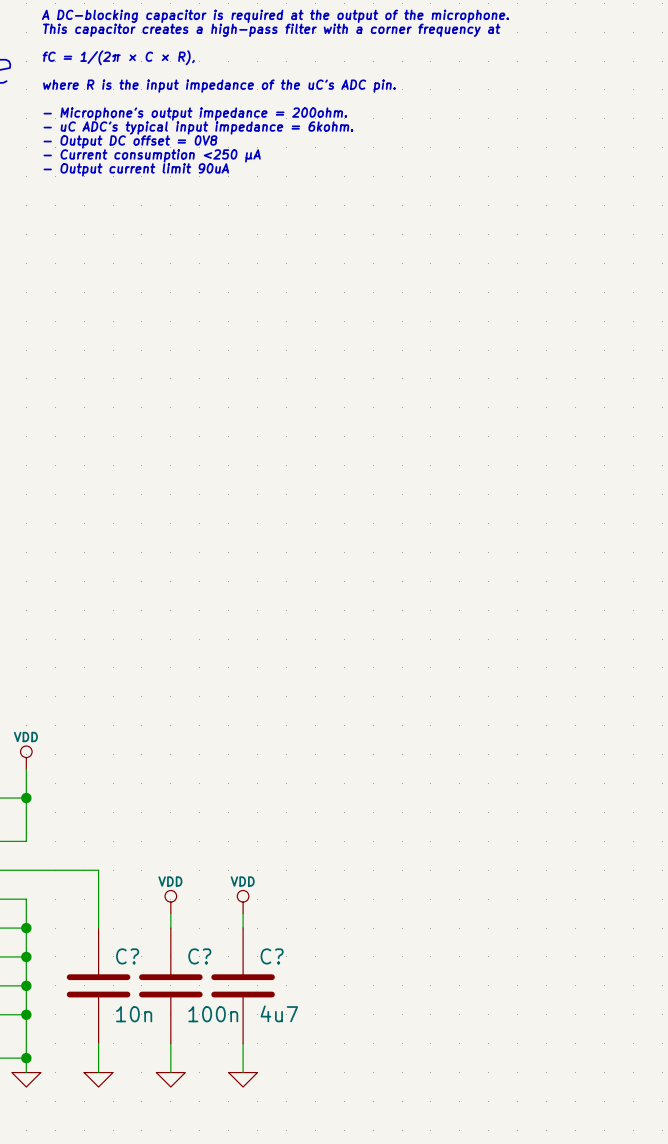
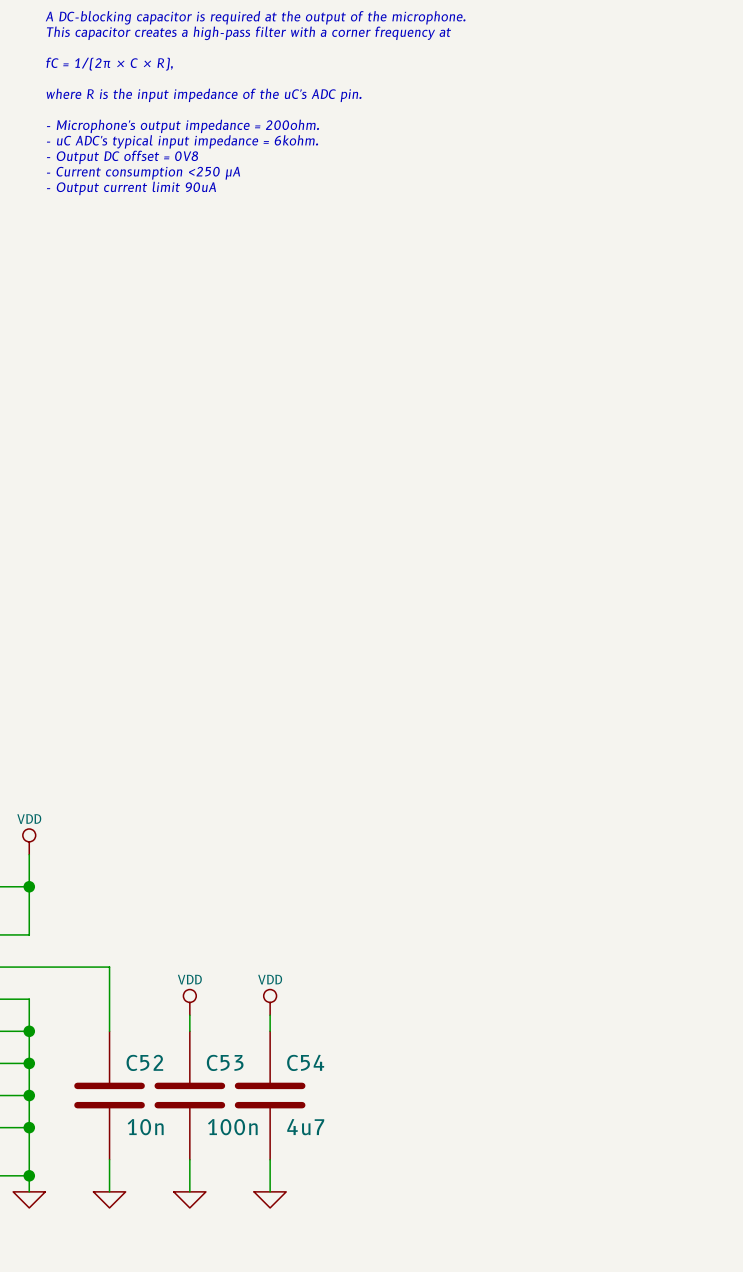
C? name: C? (127, 956) -> C52 (144, 1062)
C? name: C? (199, 956) -> C53 (225, 1062)
C? name: C? (272, 956) -> C54 (305, 1062)

